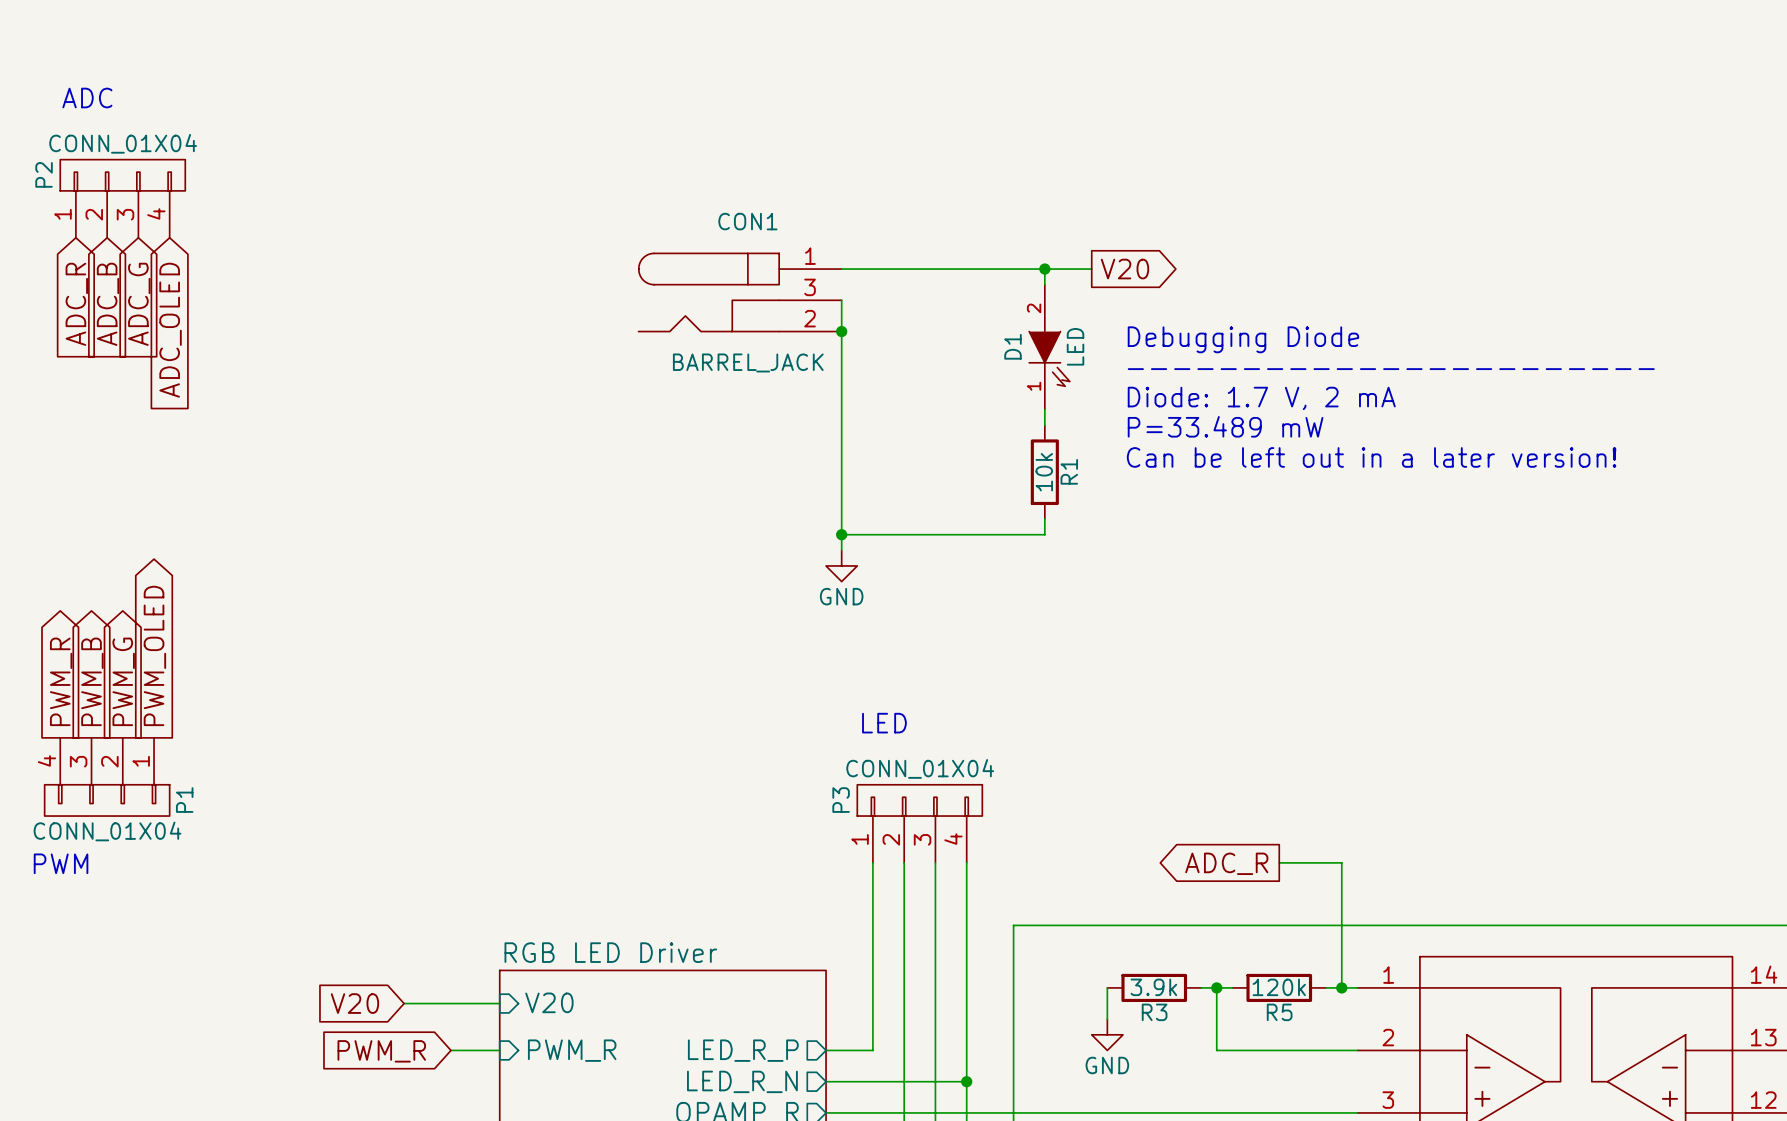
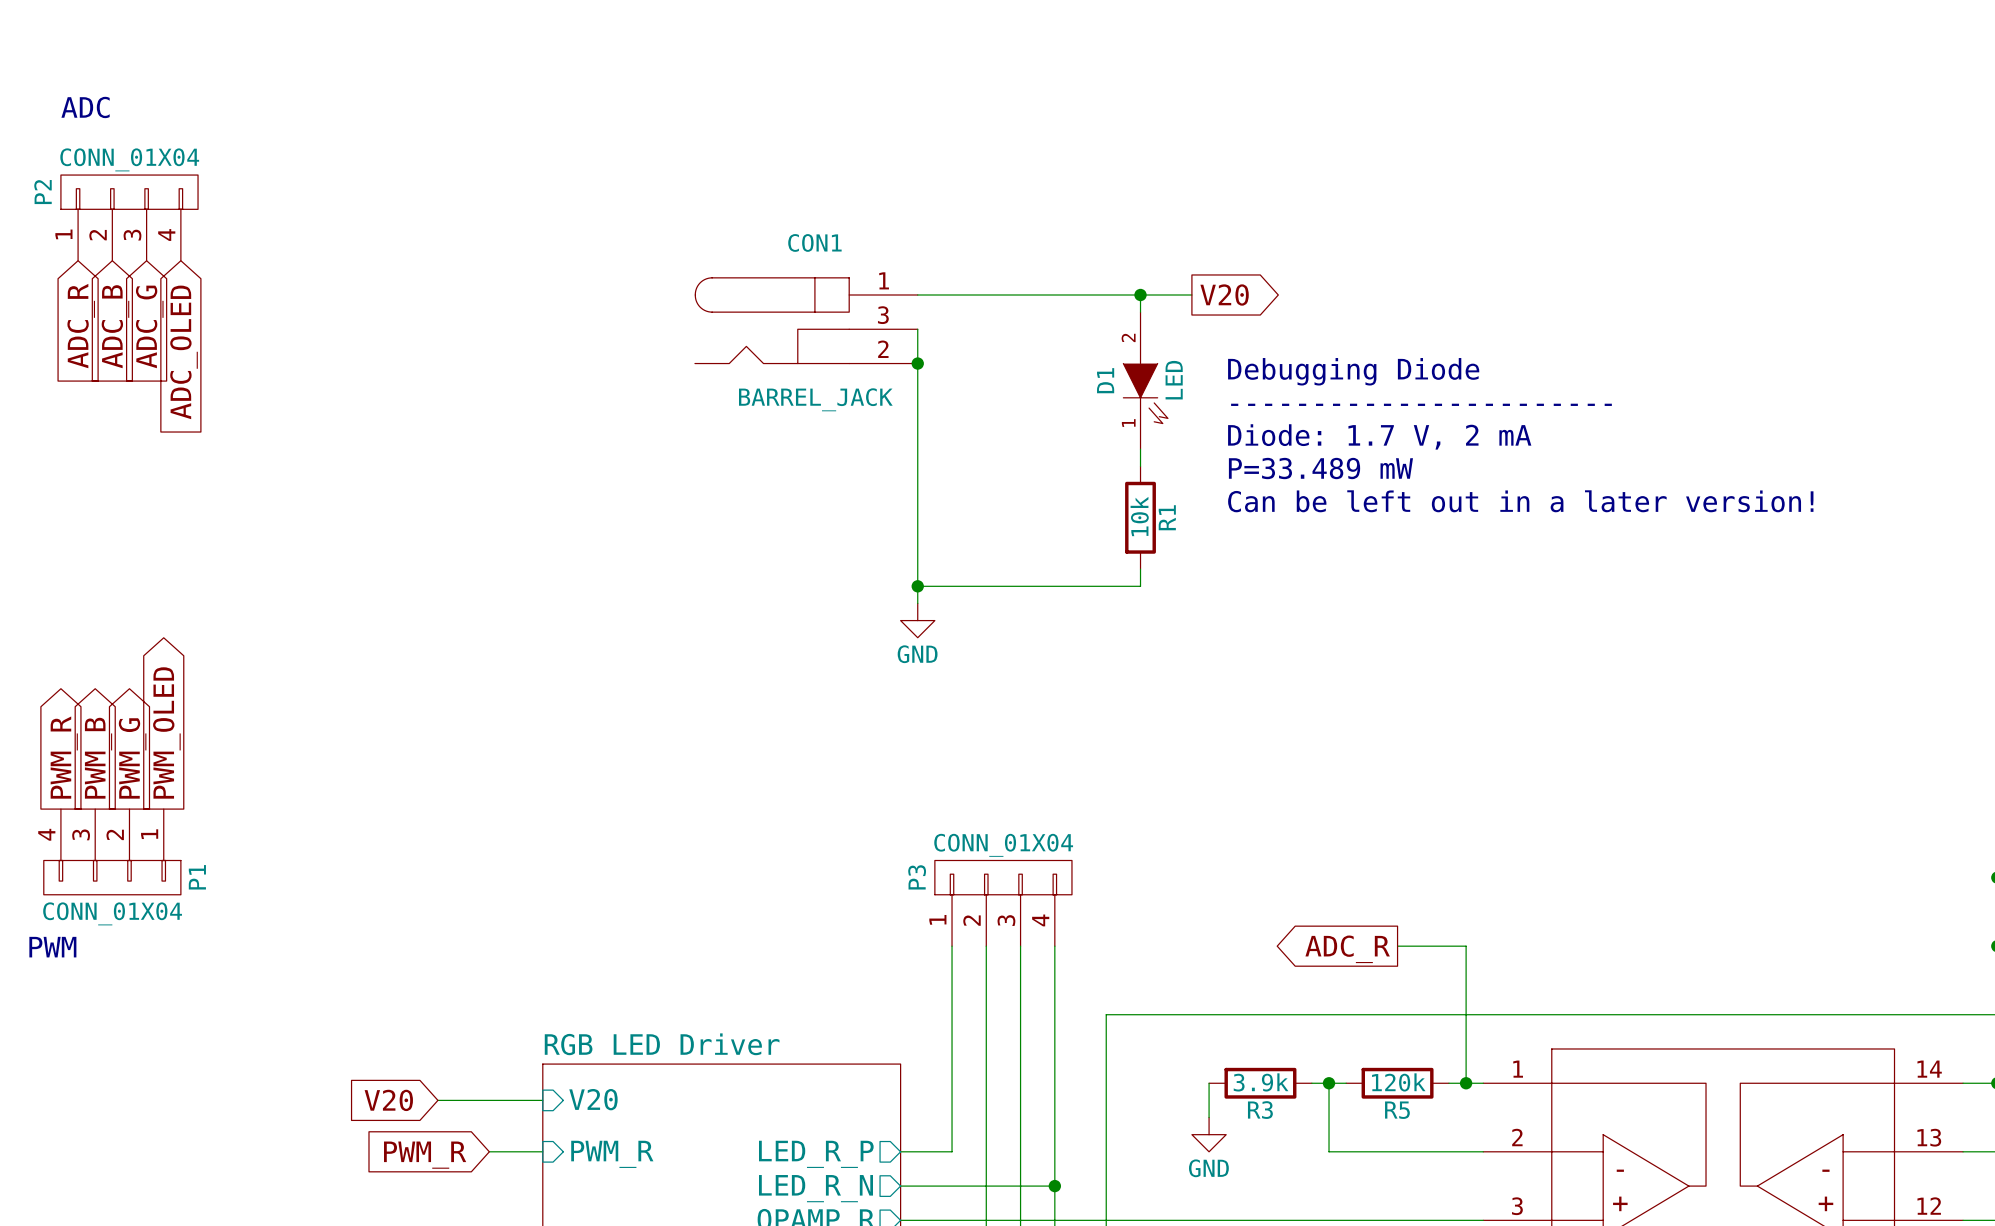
text: LED (884, 723) -> none

